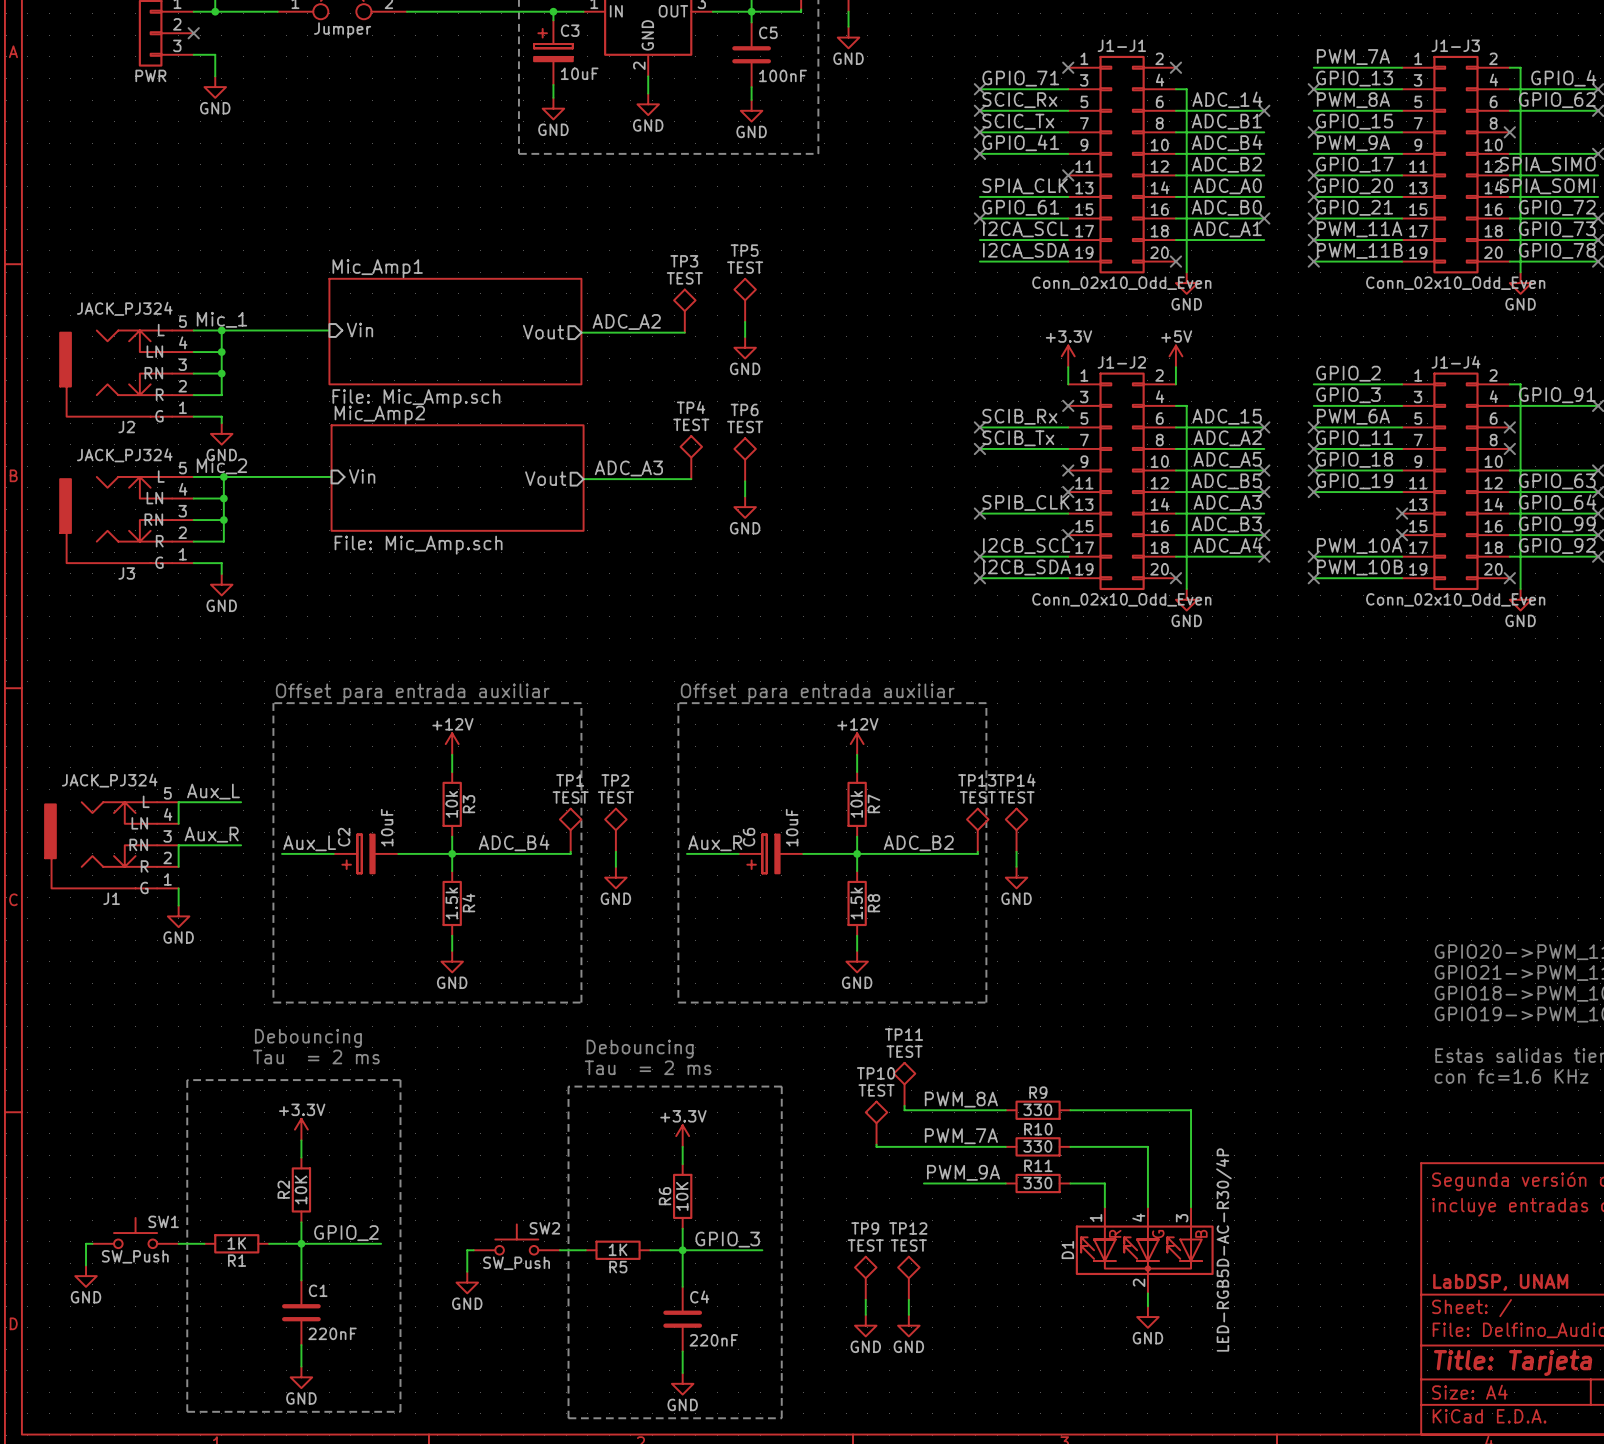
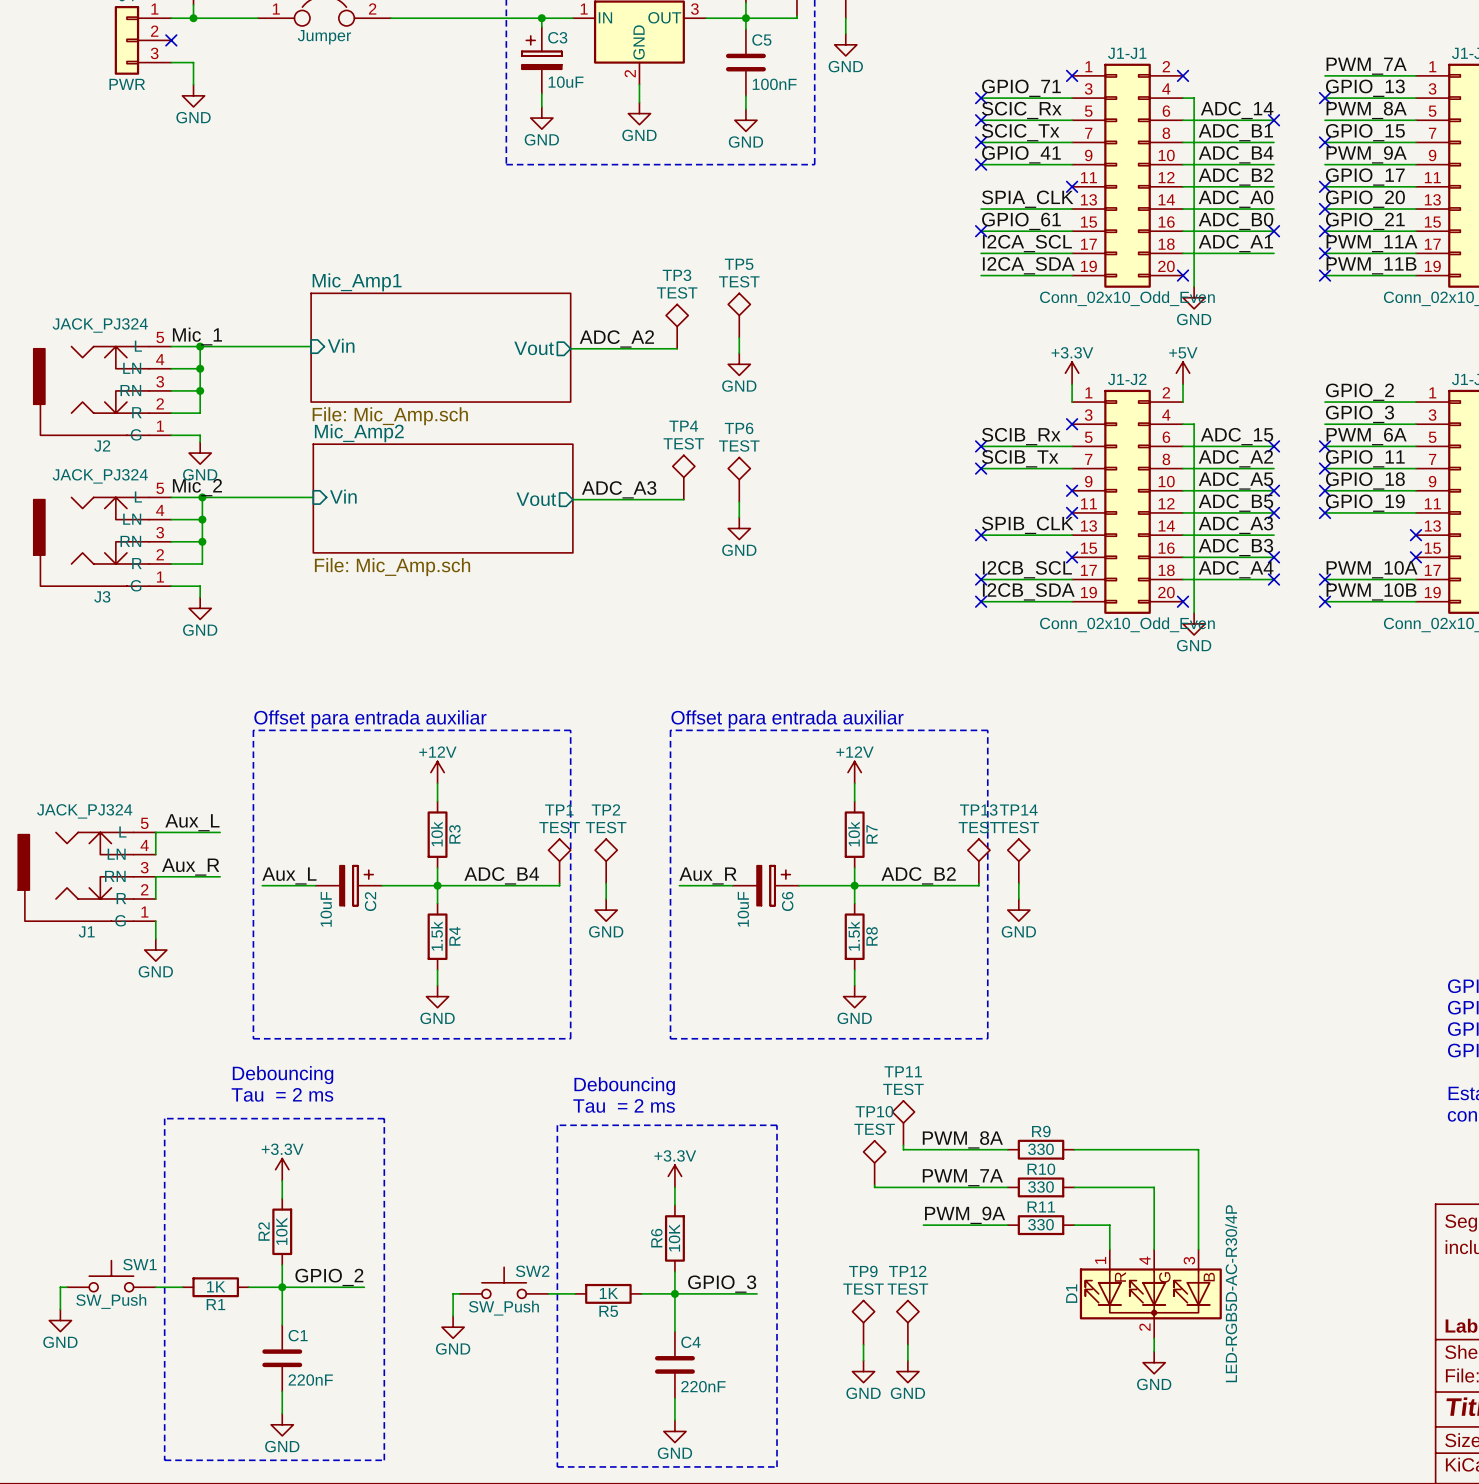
C2 rotation: 0° (358, 853) -> 180° (356, 885)
C6 rotation: 0° (763, 853) -> 180° (773, 885)

